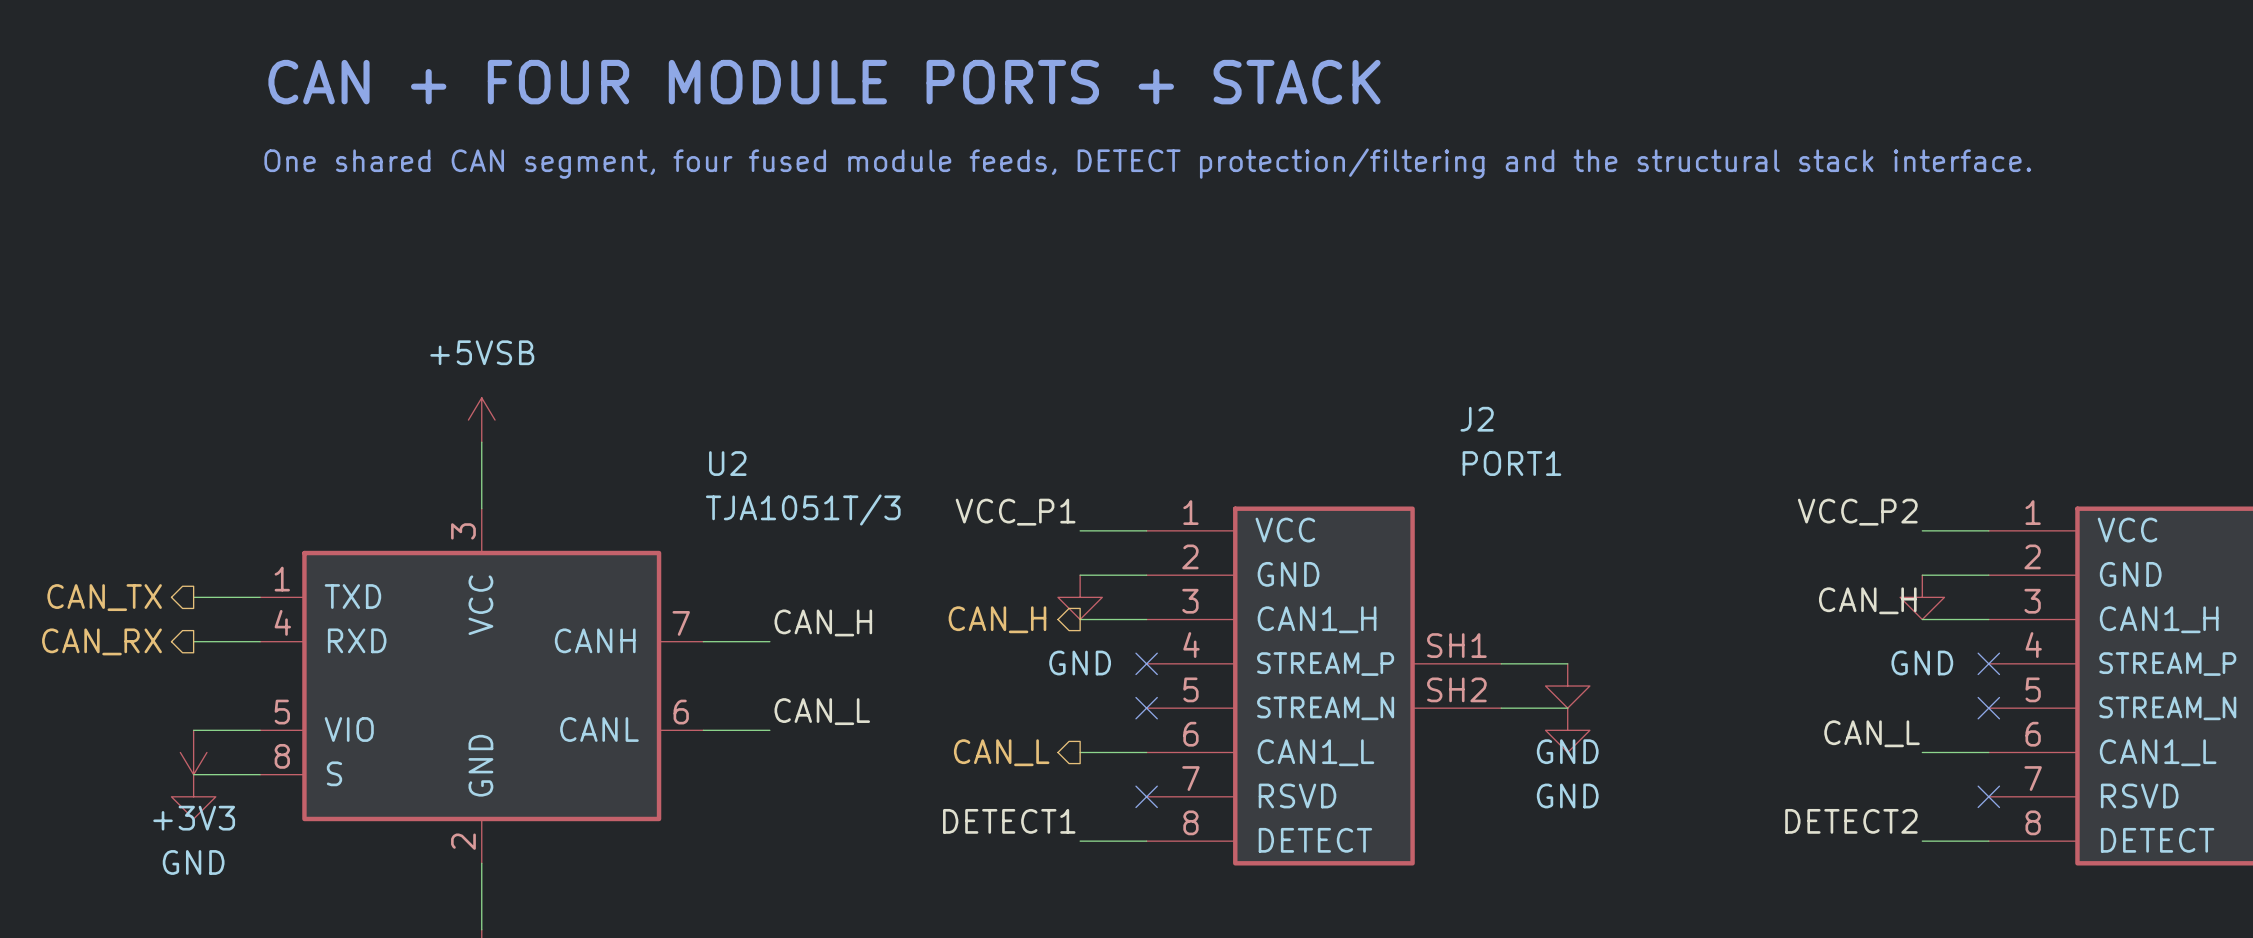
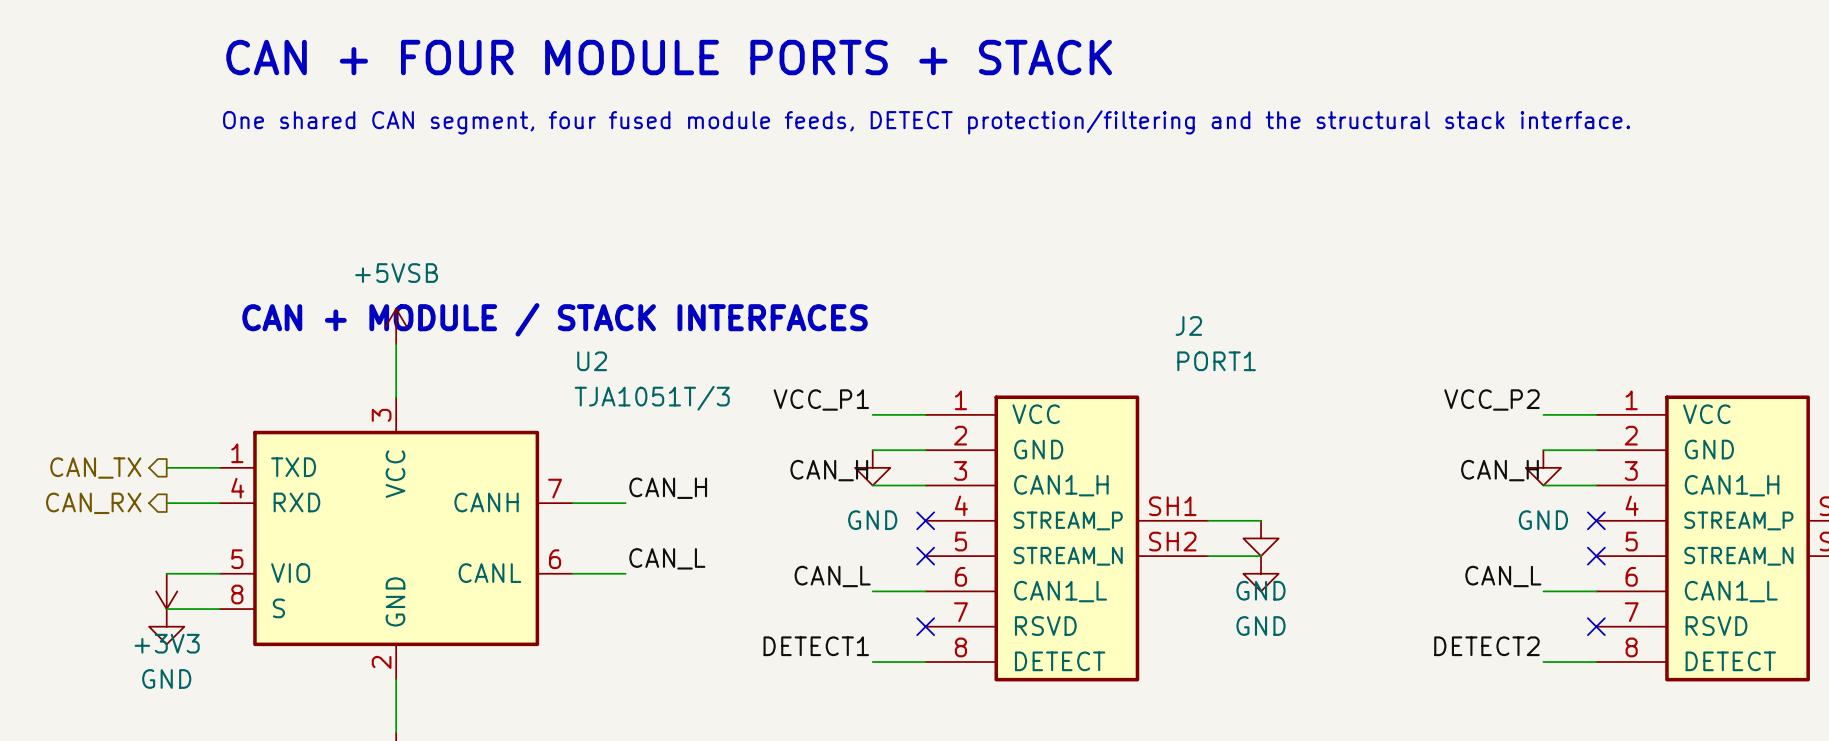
text: none -> CAN + MODULE / STACK INTERFACES (555, 319)
label: none -> CAN_H (829, 470)
hierarchical label: CAN_H (997, 619) -> none
label: none -> CAN_L (832, 576)
hierarchical label: CAN_L (1001, 752) -> none

